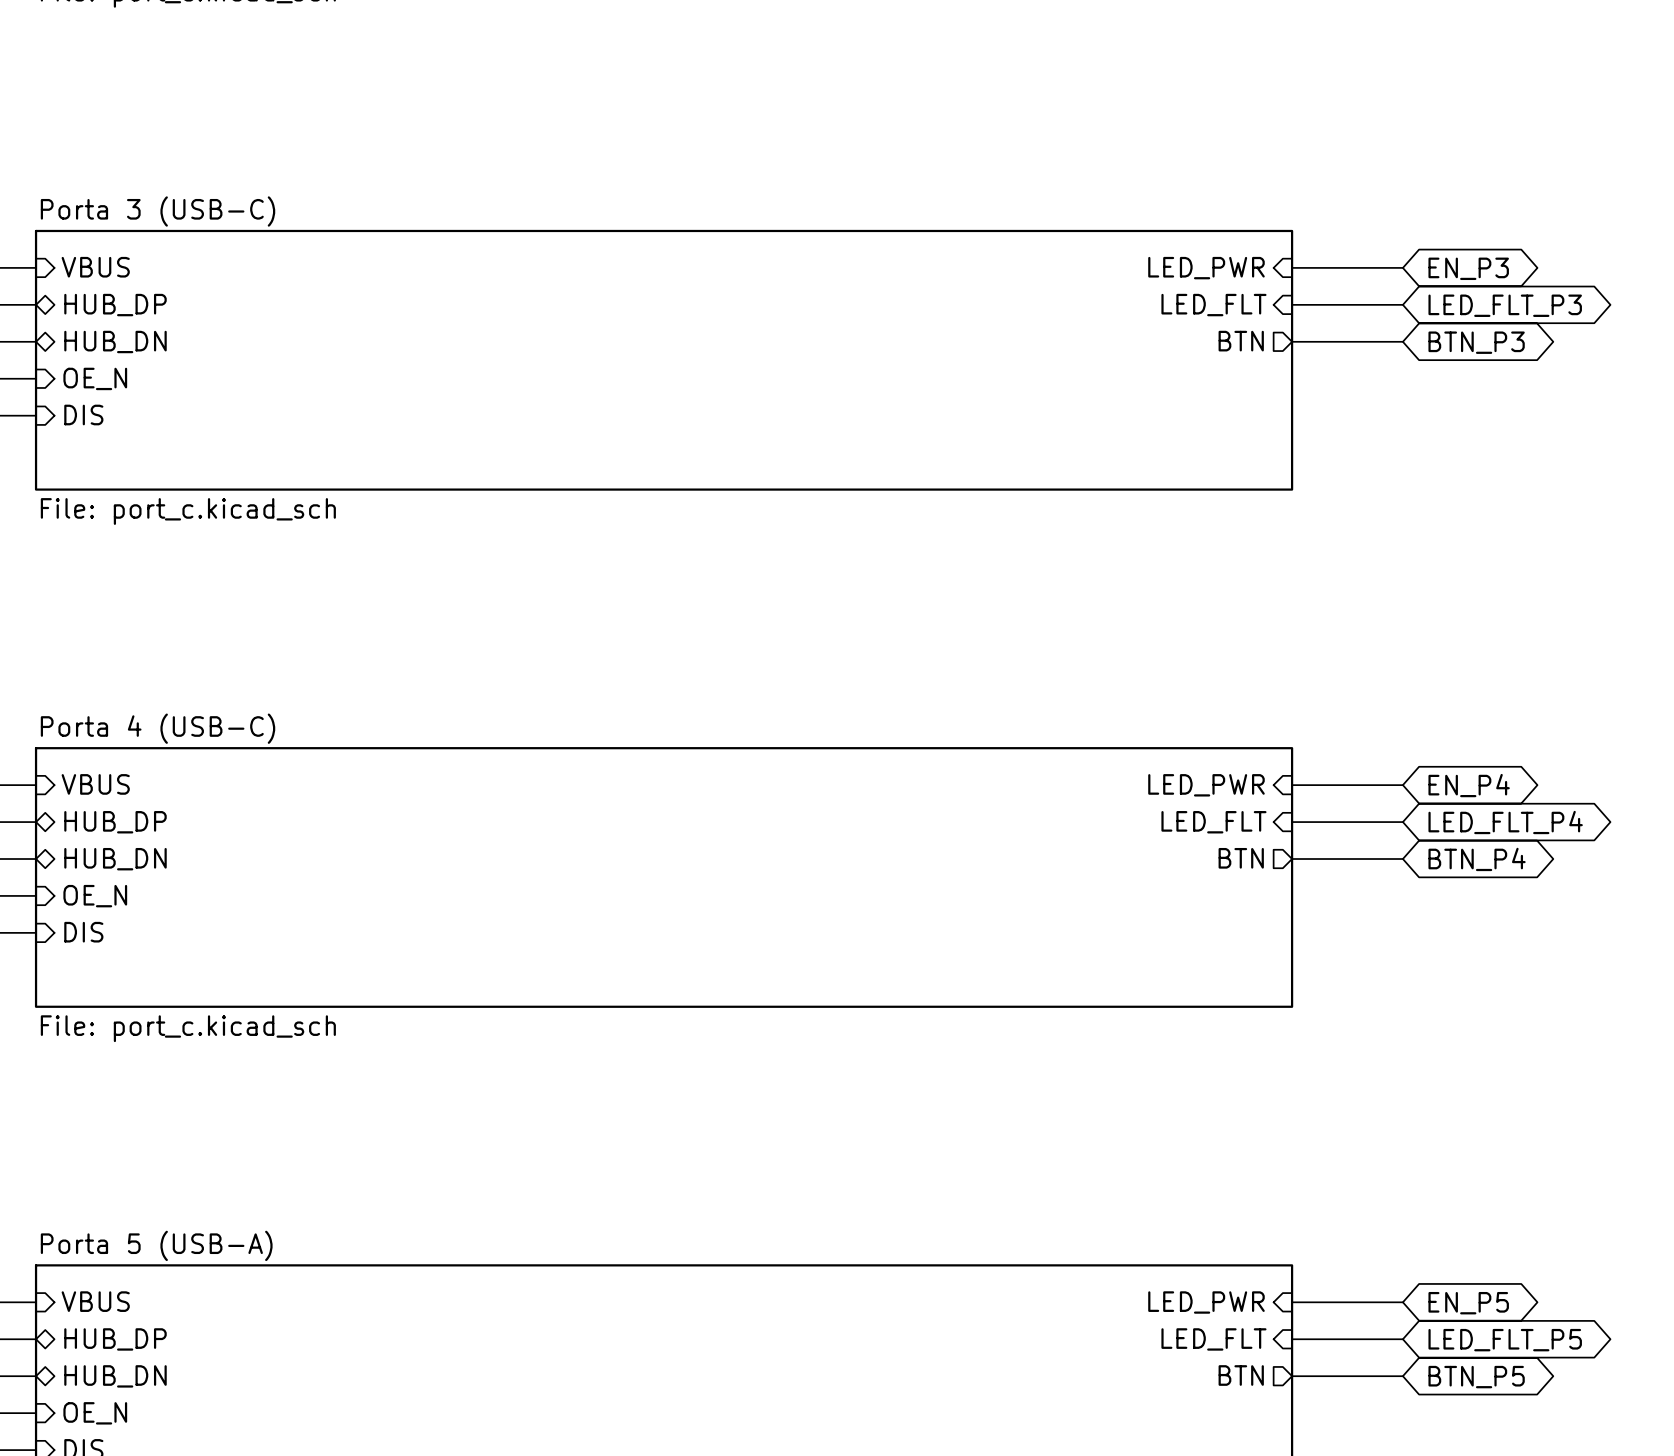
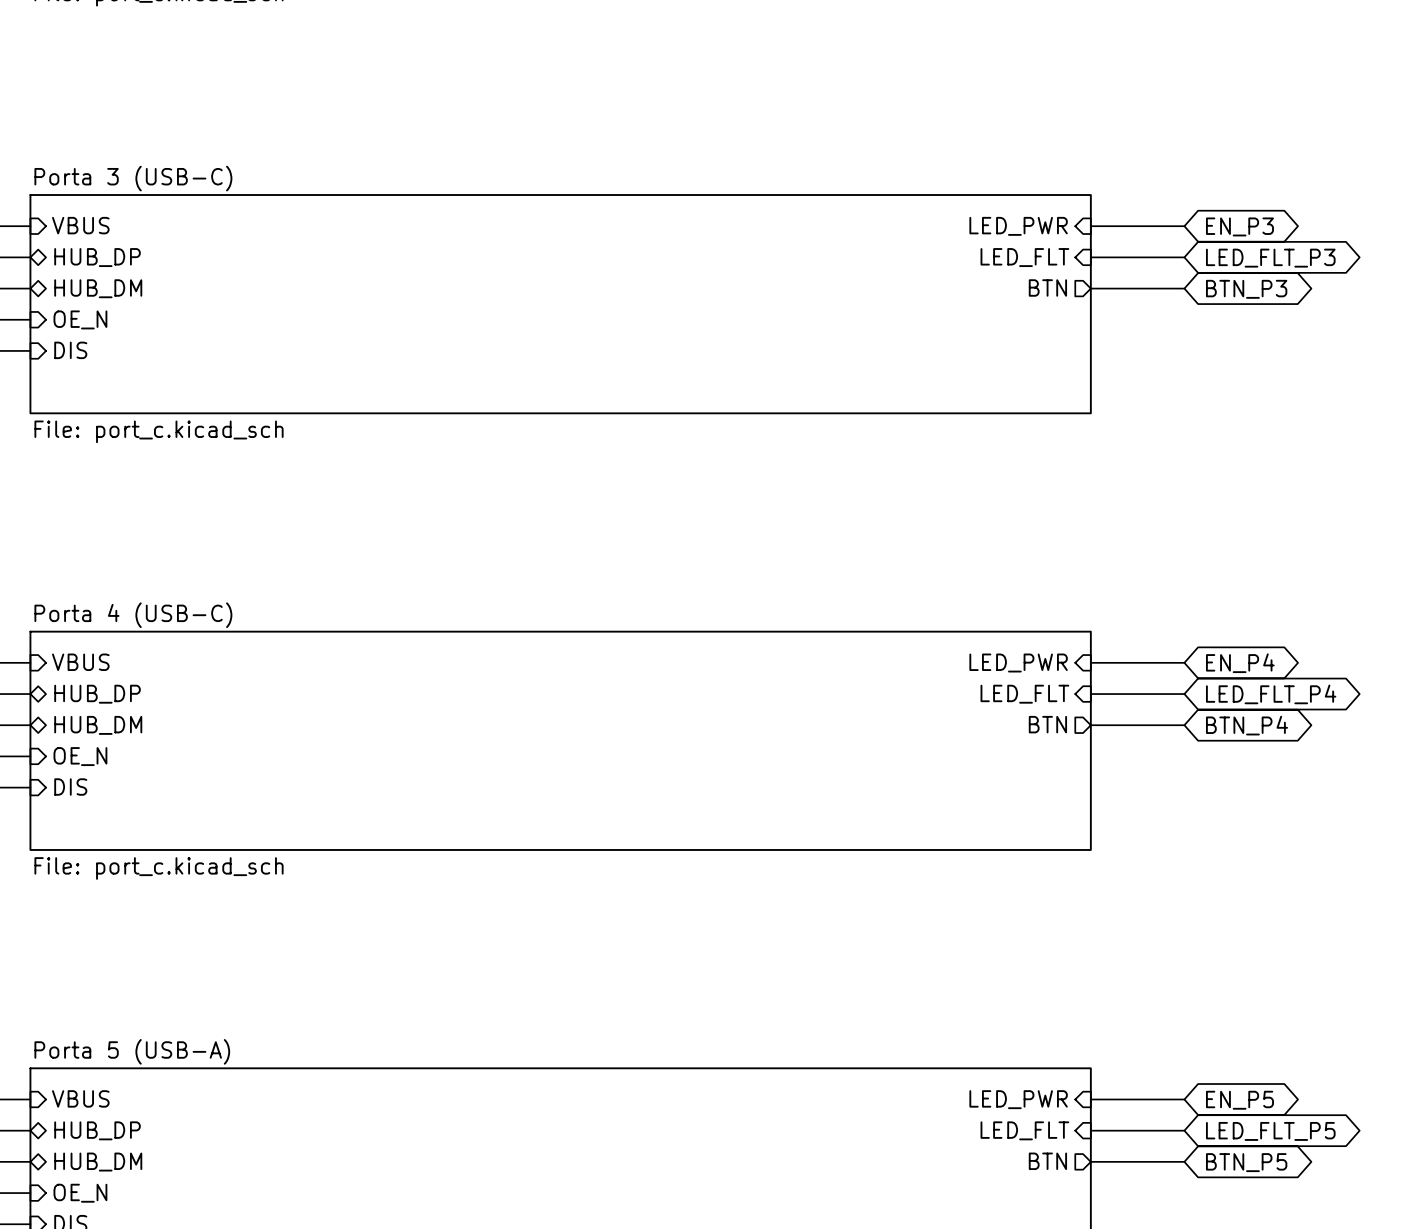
sheet pin: HUB_DN (115, 341) -> HUB_DM (98, 288)
sheet pin: HUB_DN (115, 859) -> HUB_DM (98, 725)
sheet pin: HUB_DN (115, 1376) -> HUB_DM (98, 1162)

